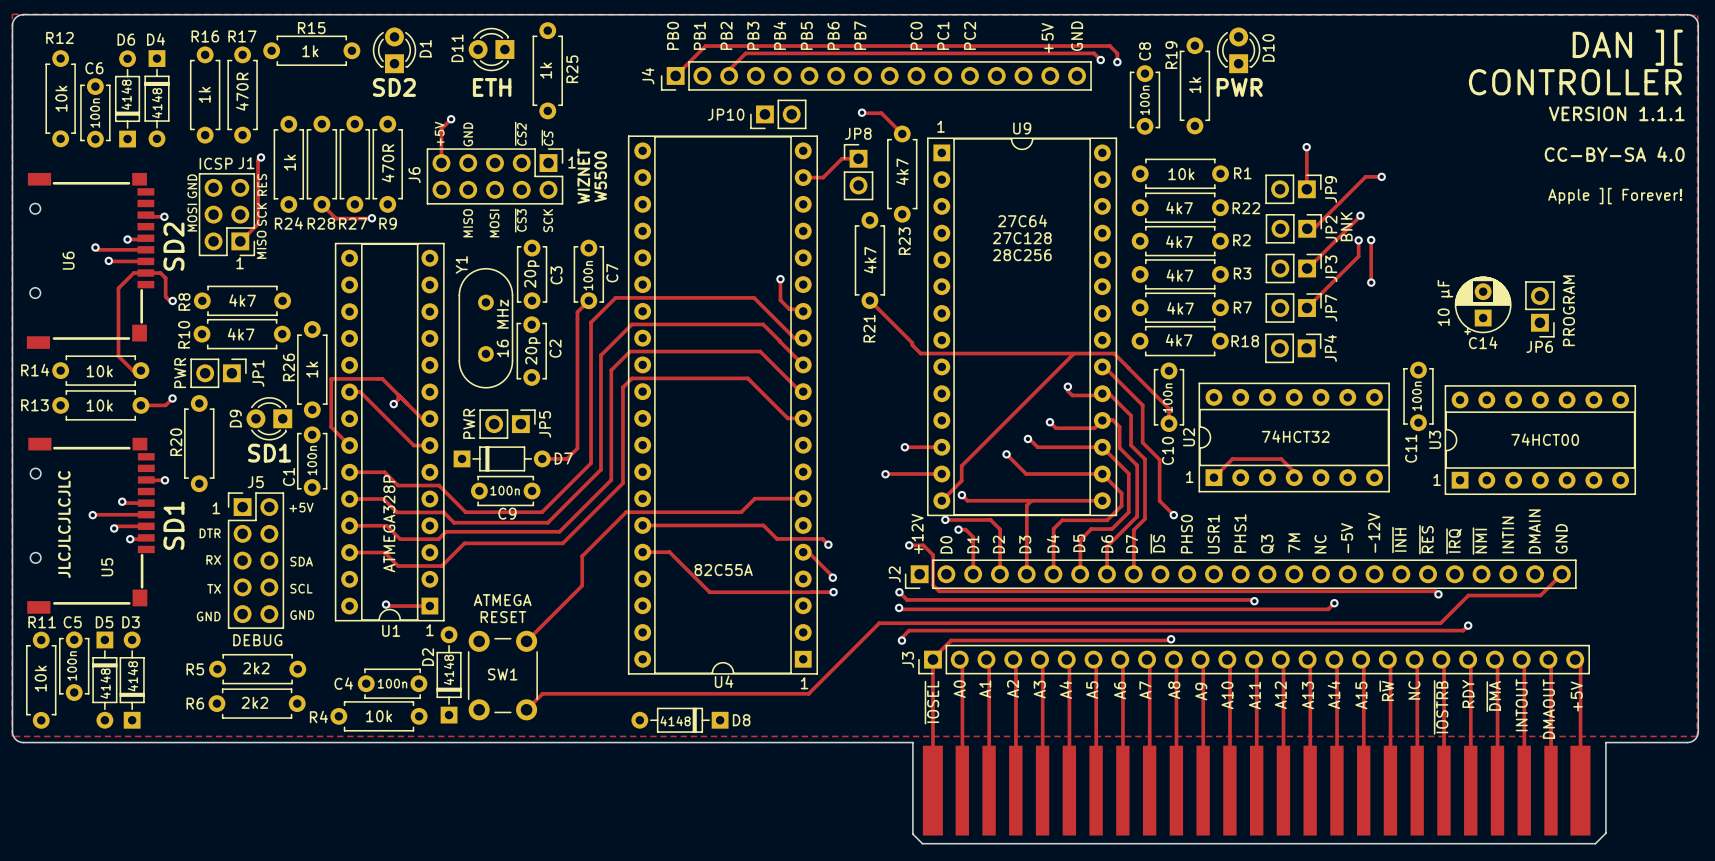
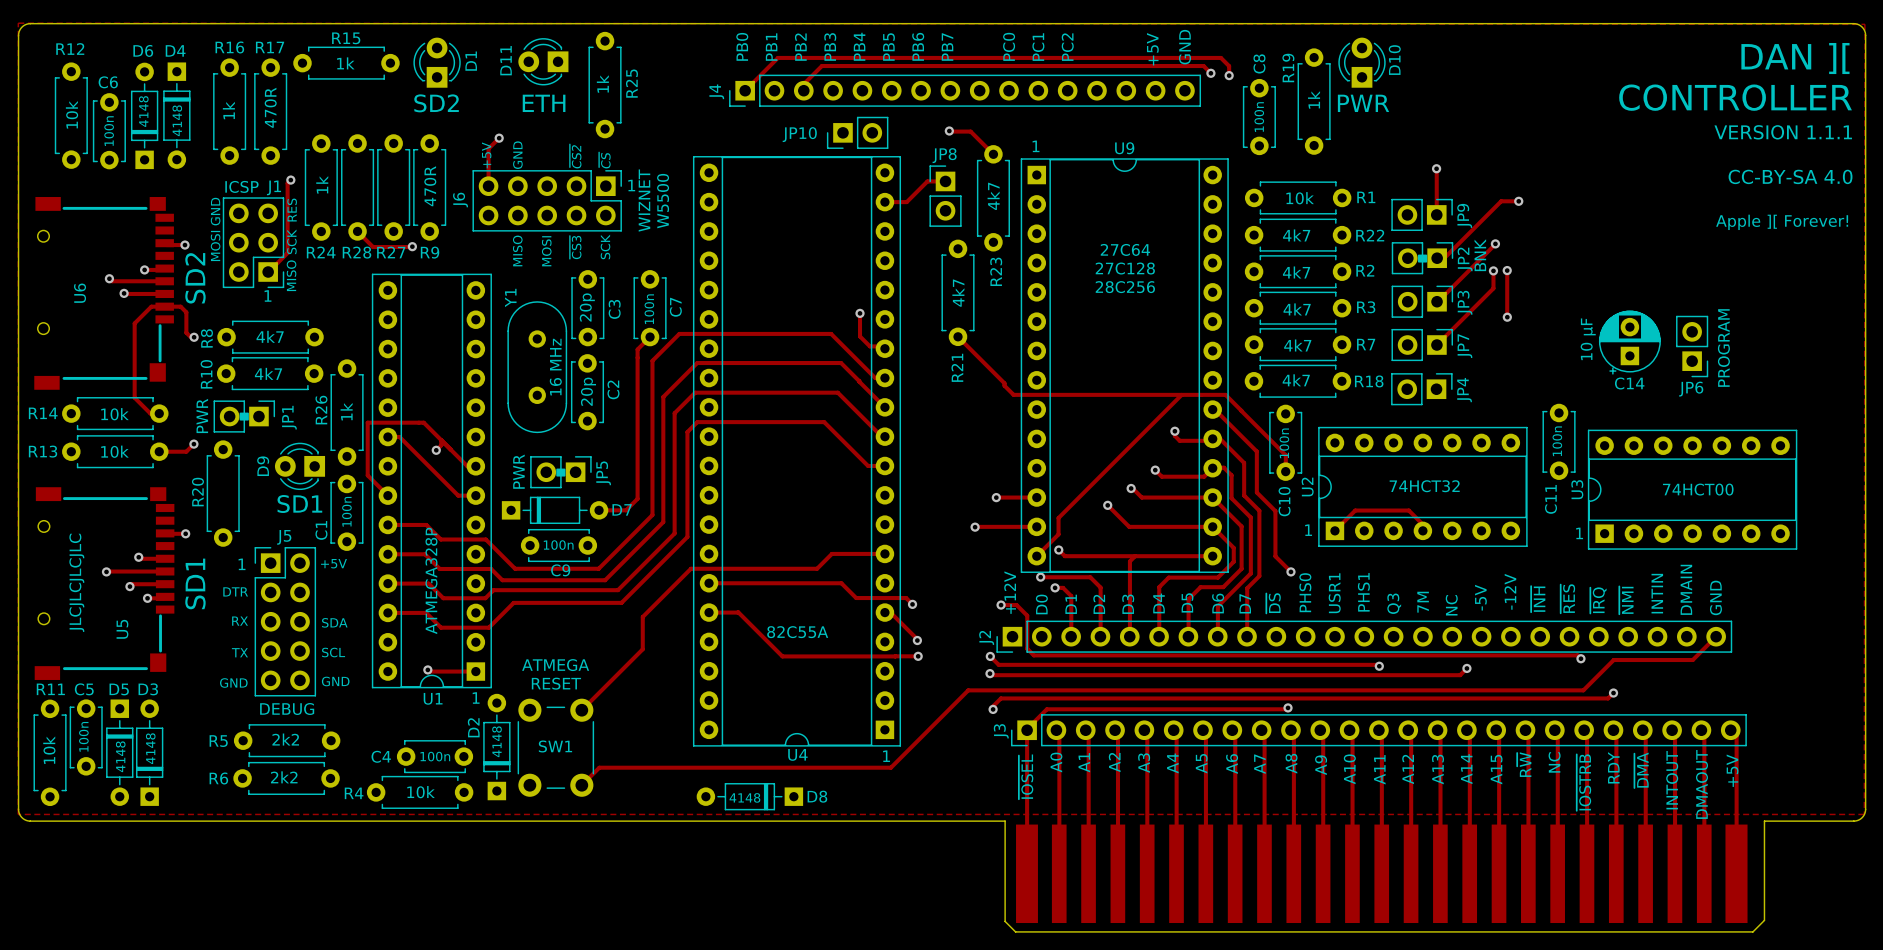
drawing: none -> [1417, 254, 1428, 263]
drawing: none -> [239, 412, 249, 421]
drawing: none -> [556, 468, 566, 477]

